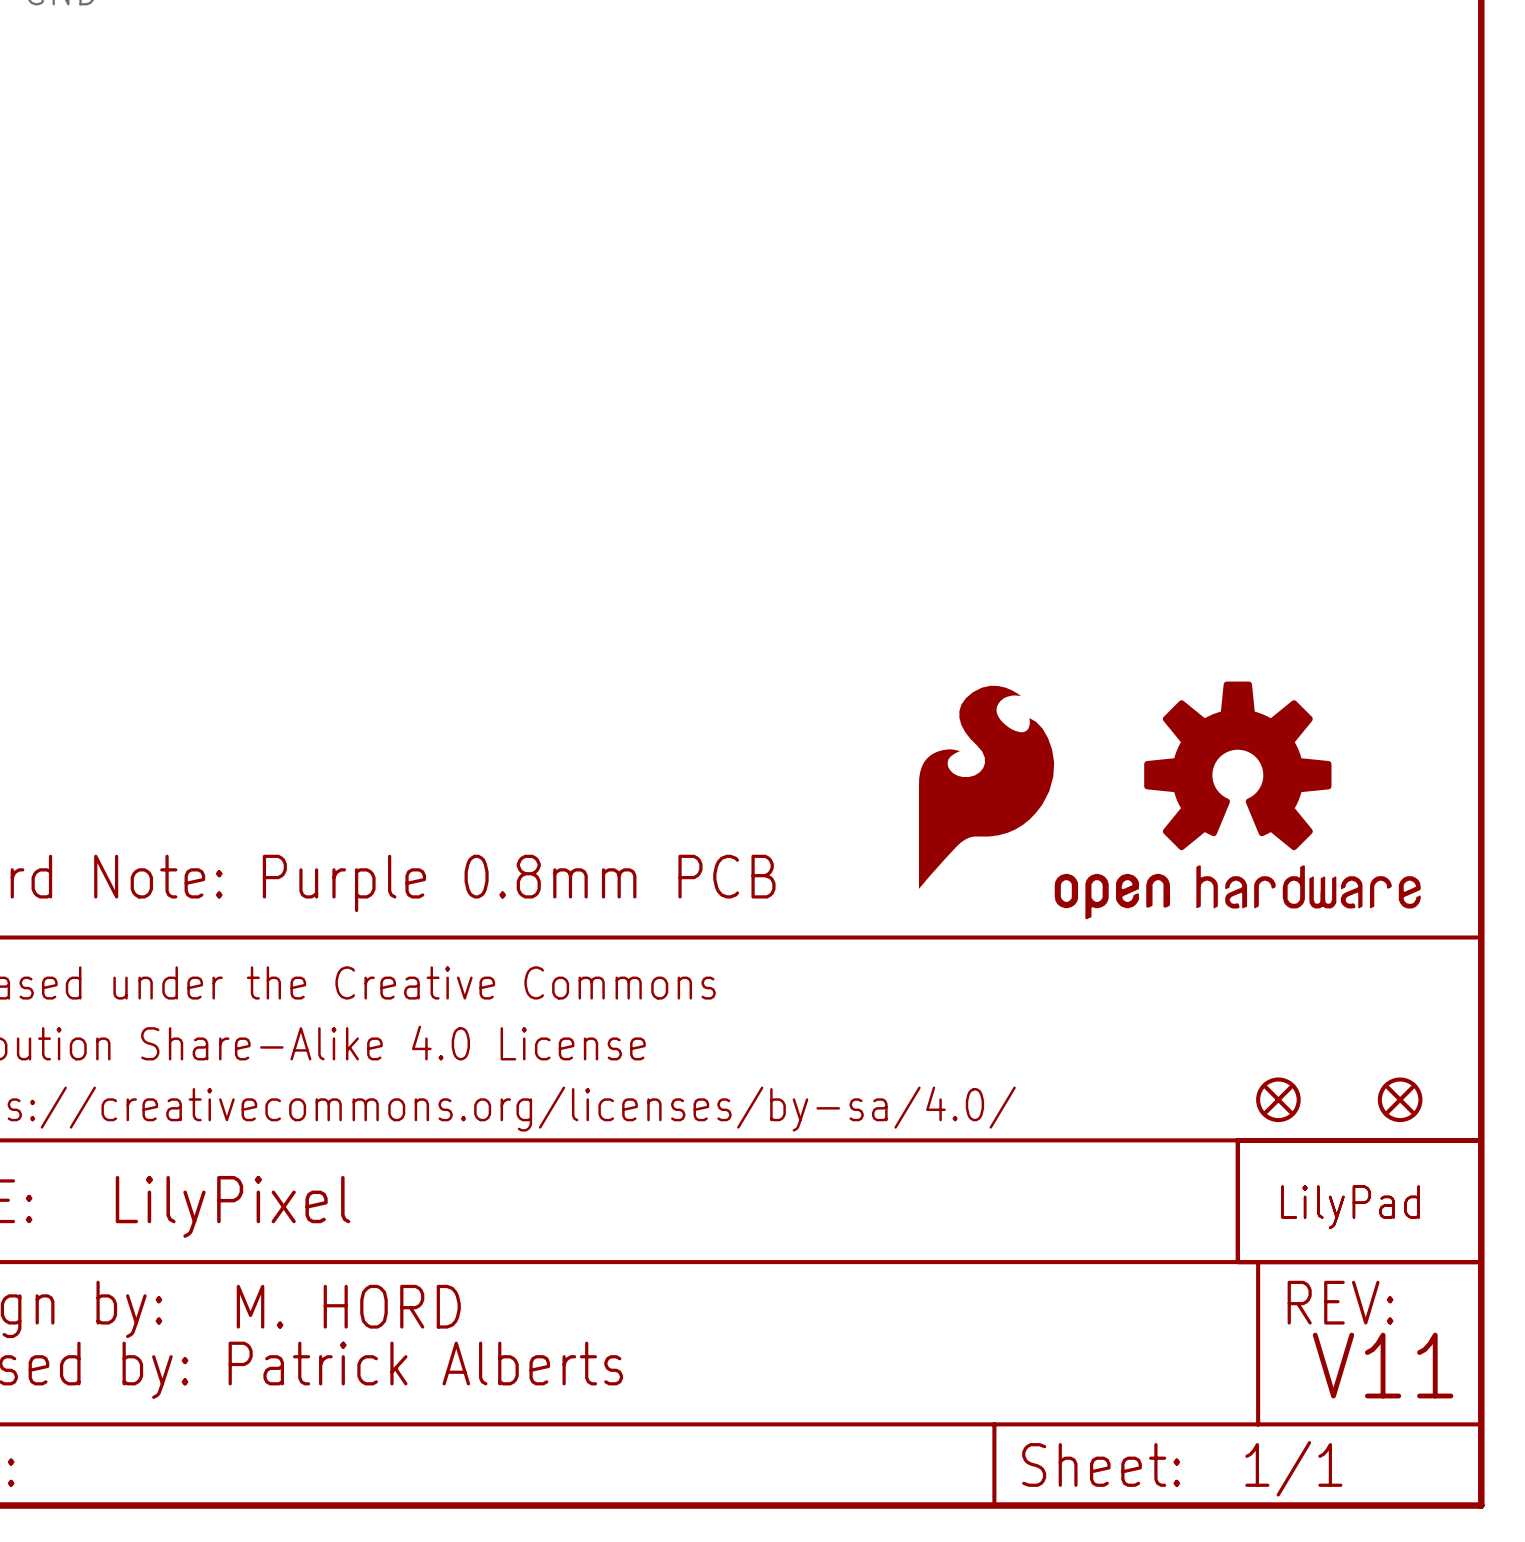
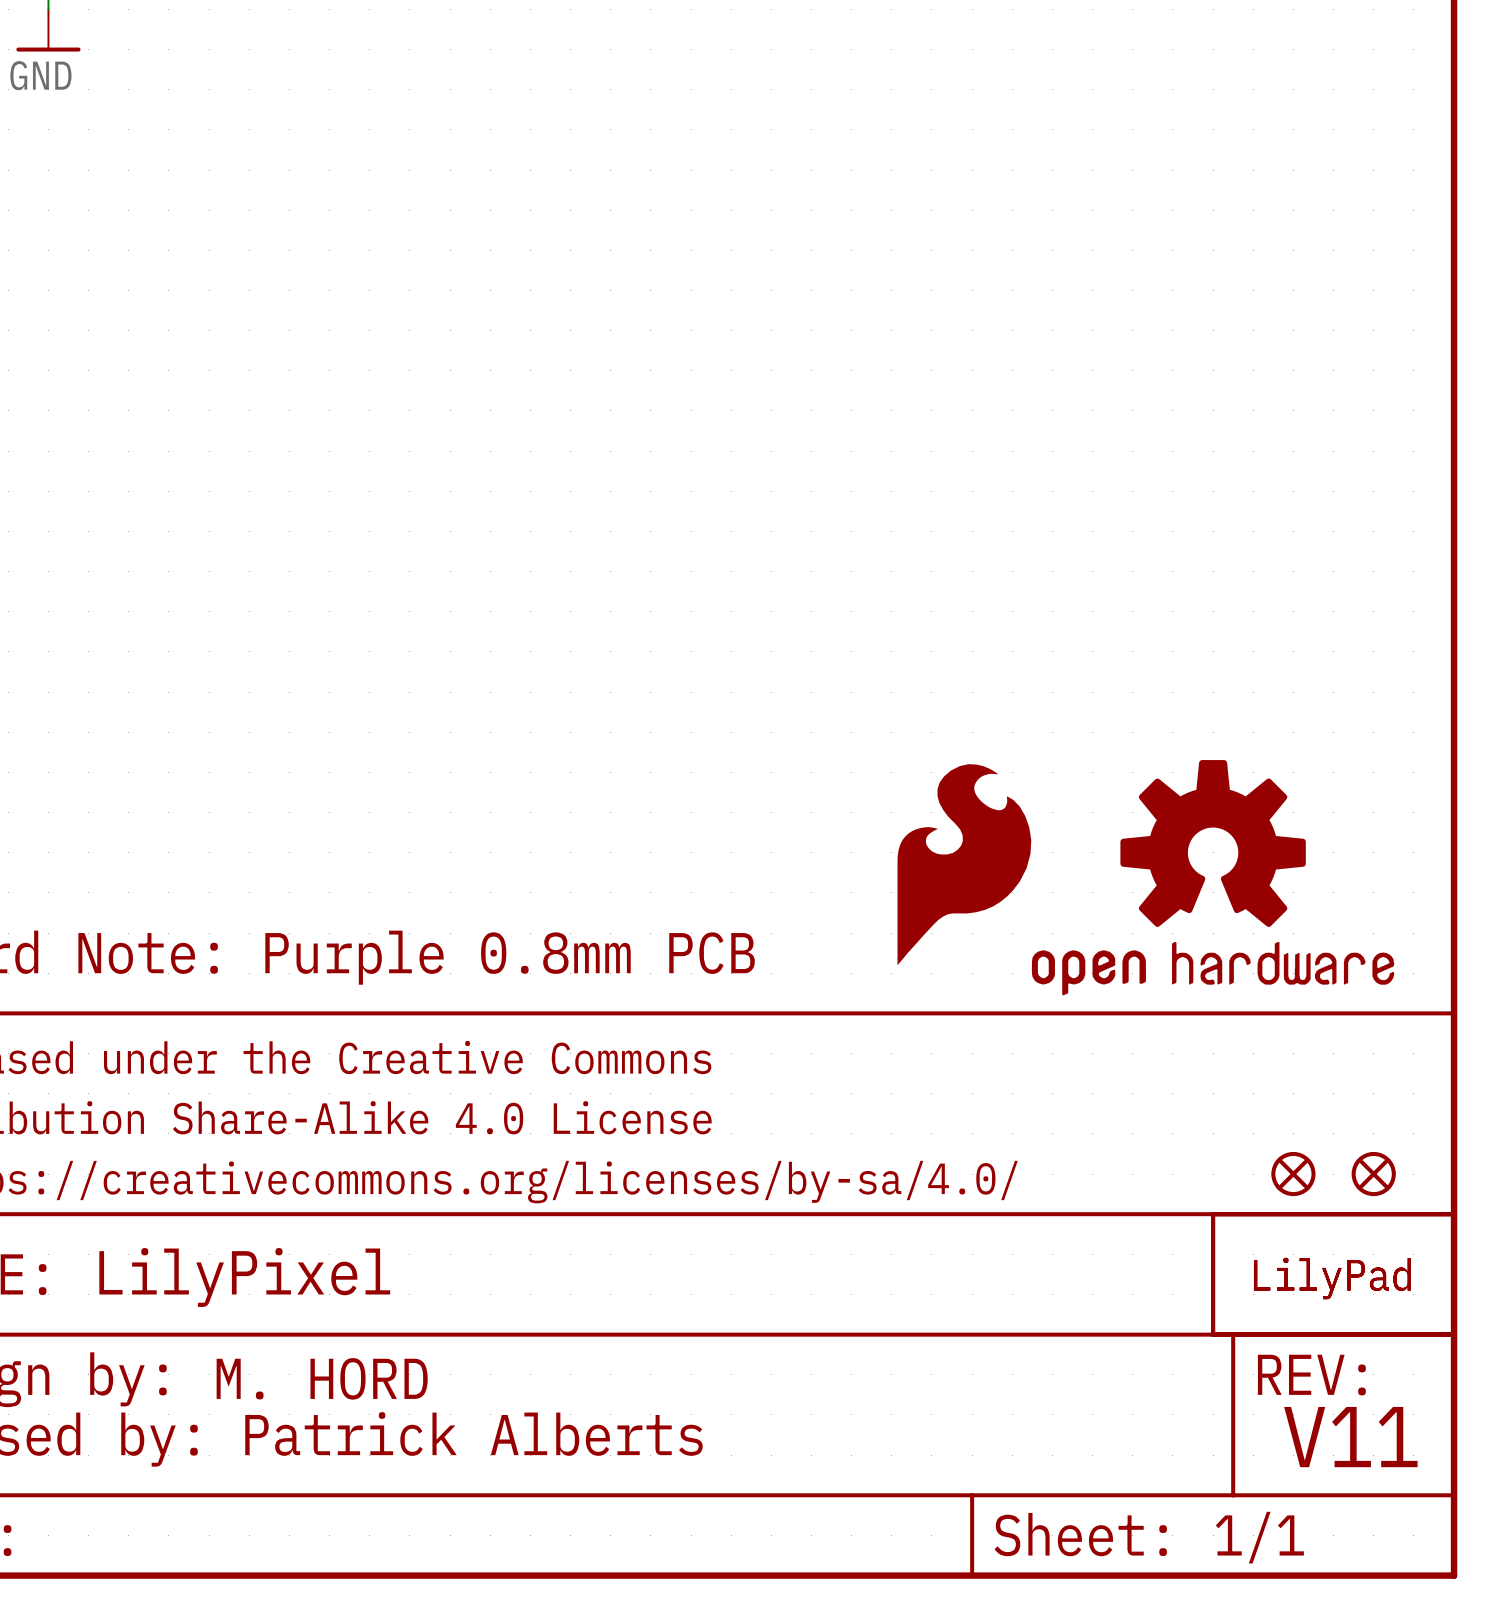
part position: (1278, 1099) -> (1293, 1174)

